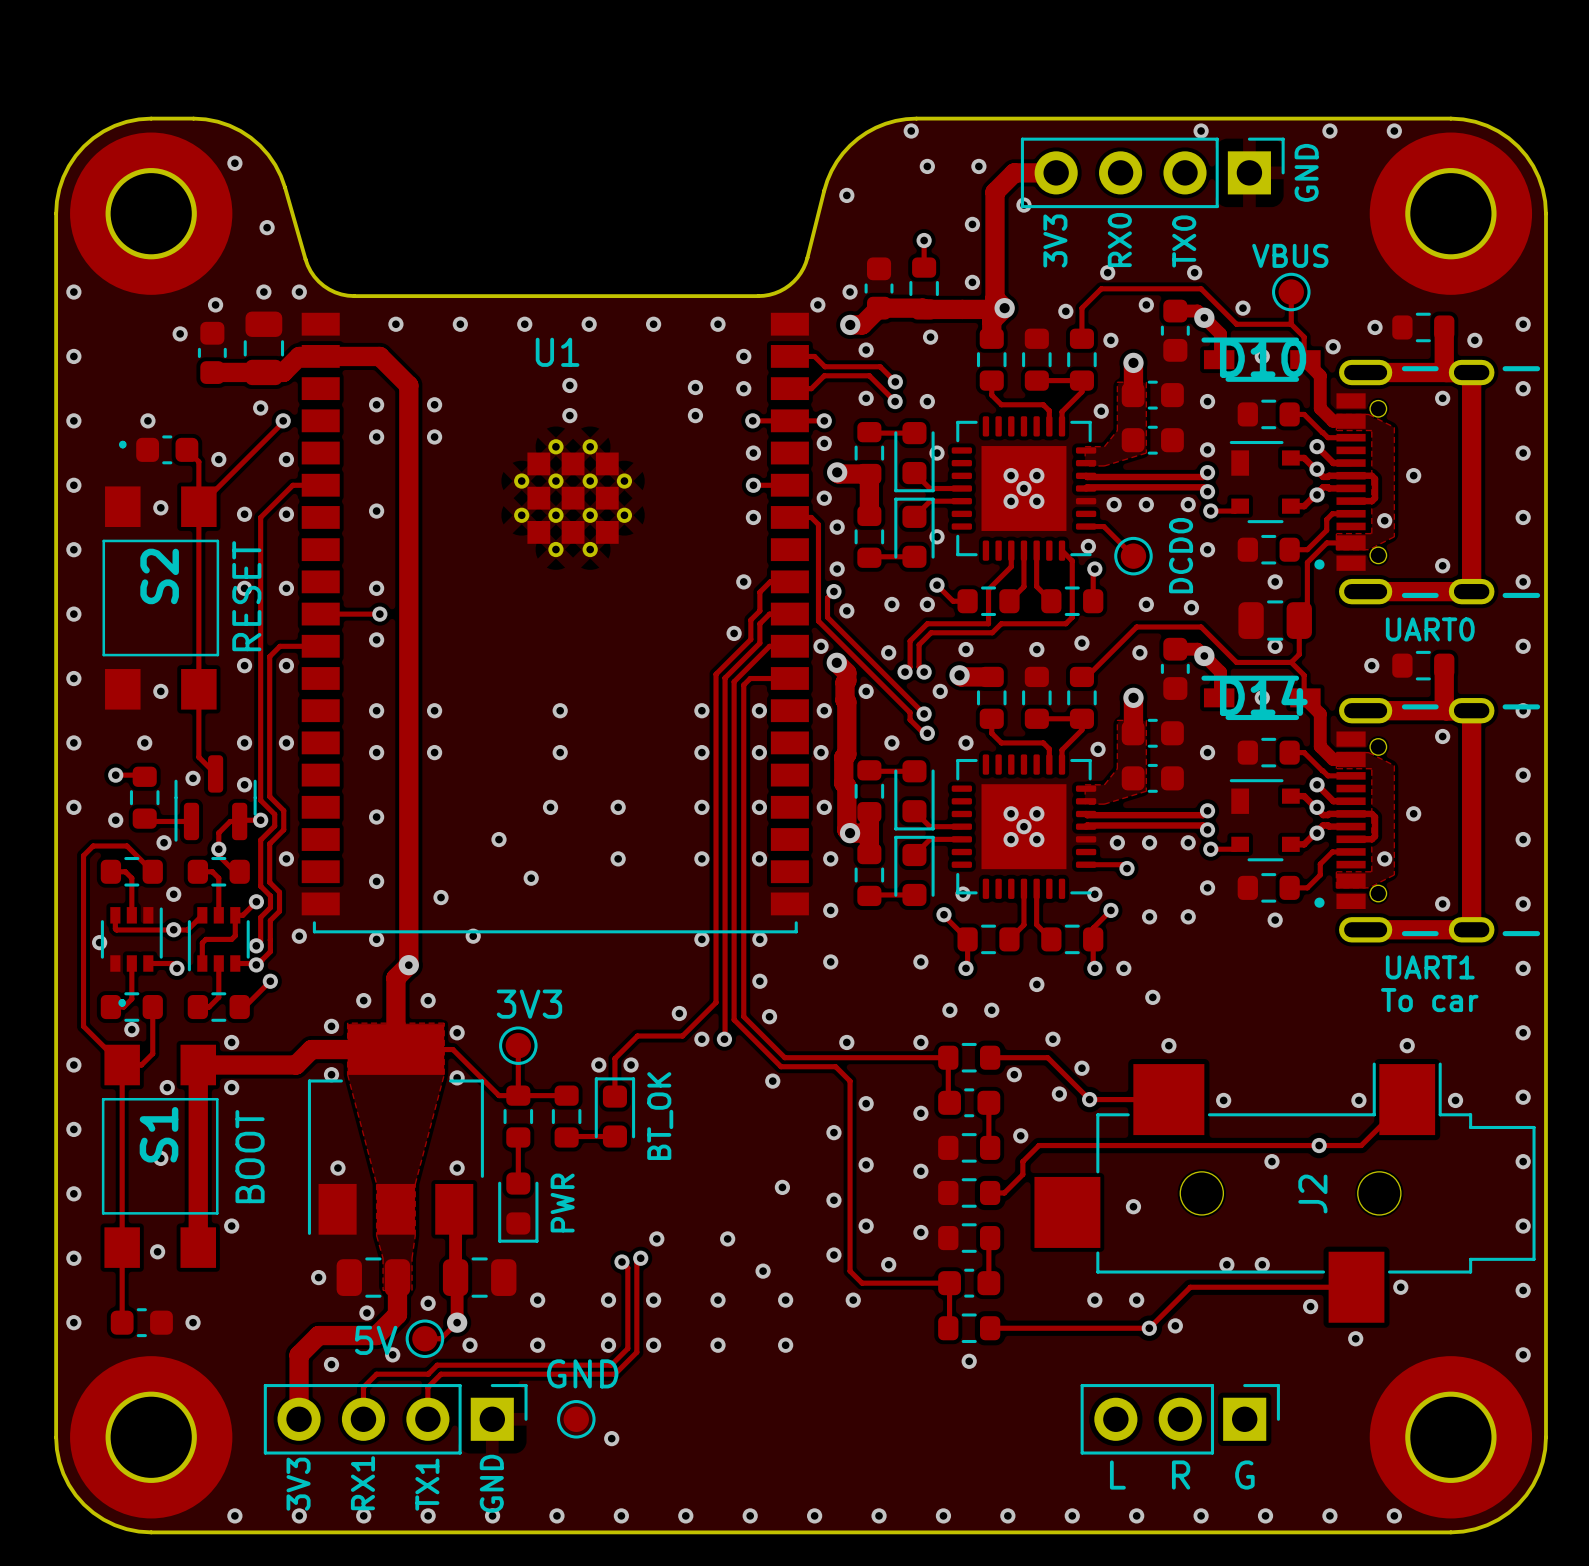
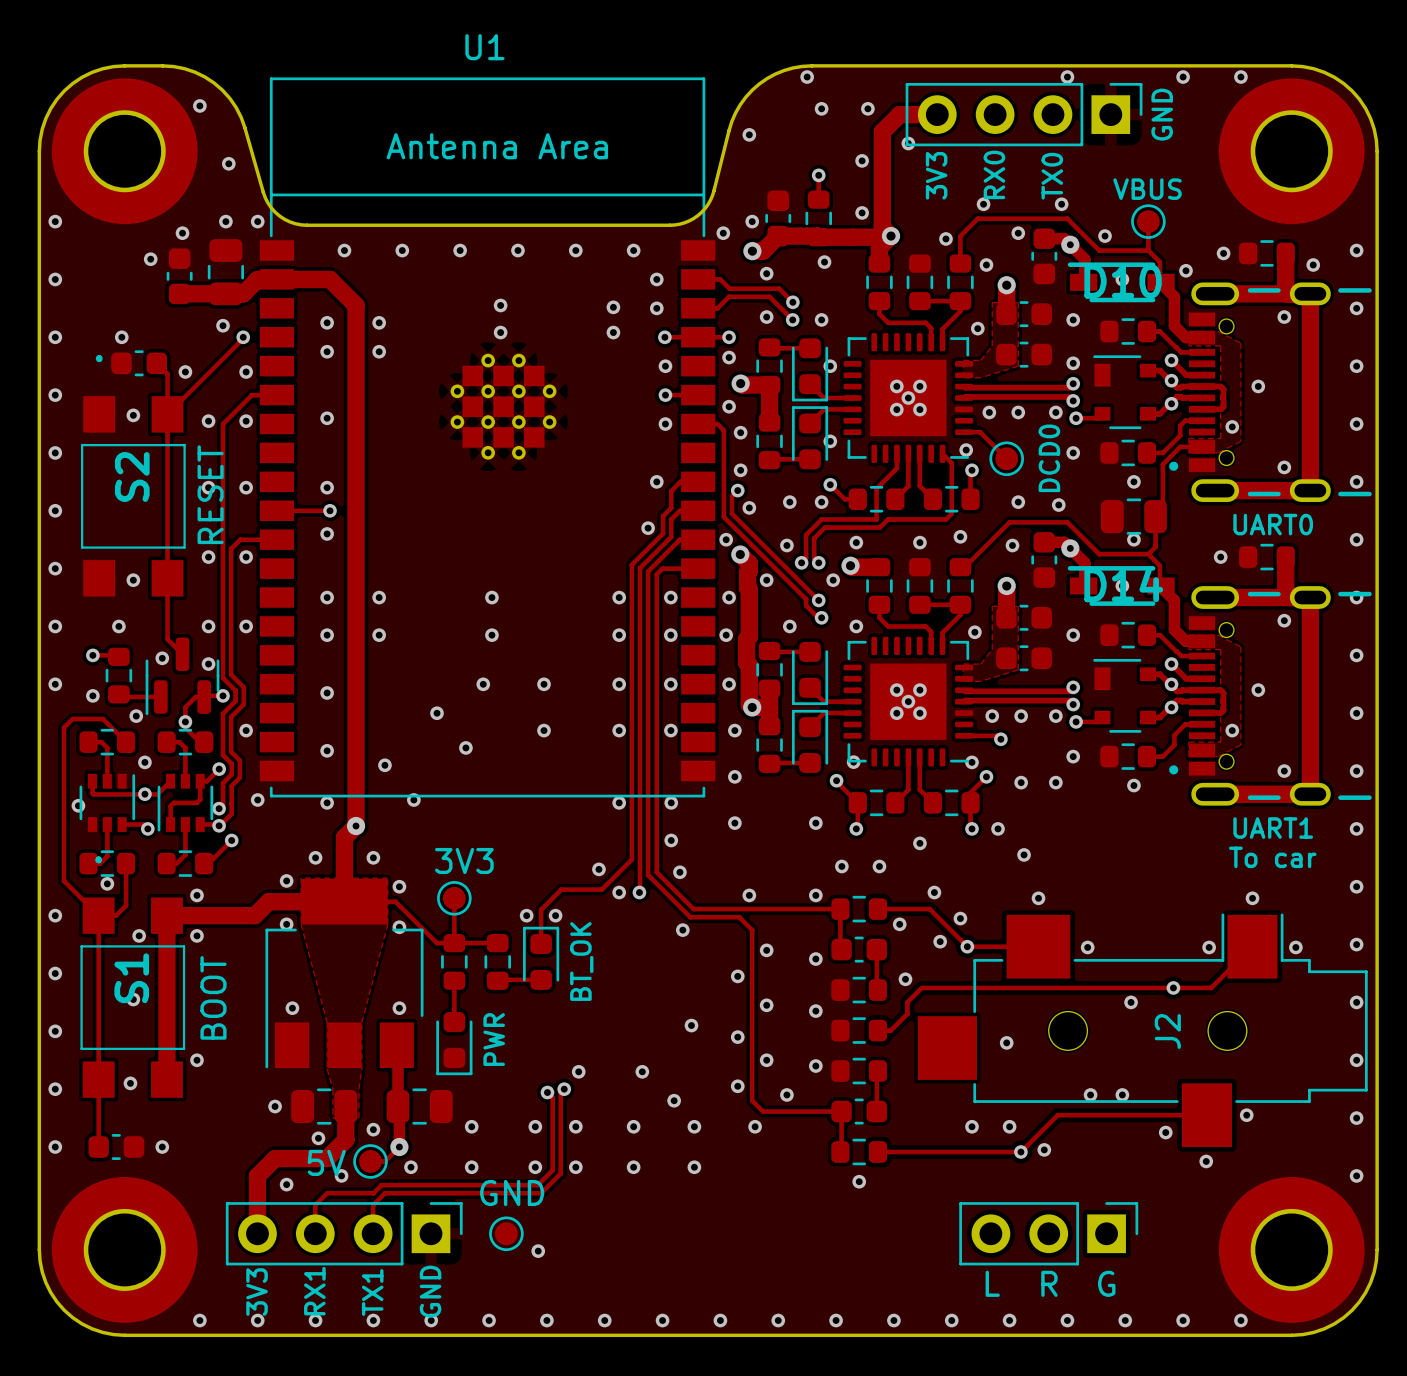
U1 footprint: [301, 312, 809, 934] -> [259, 77, 716, 798]
U1 name position: U1 (557, 352) -> U1 (484, 47)

